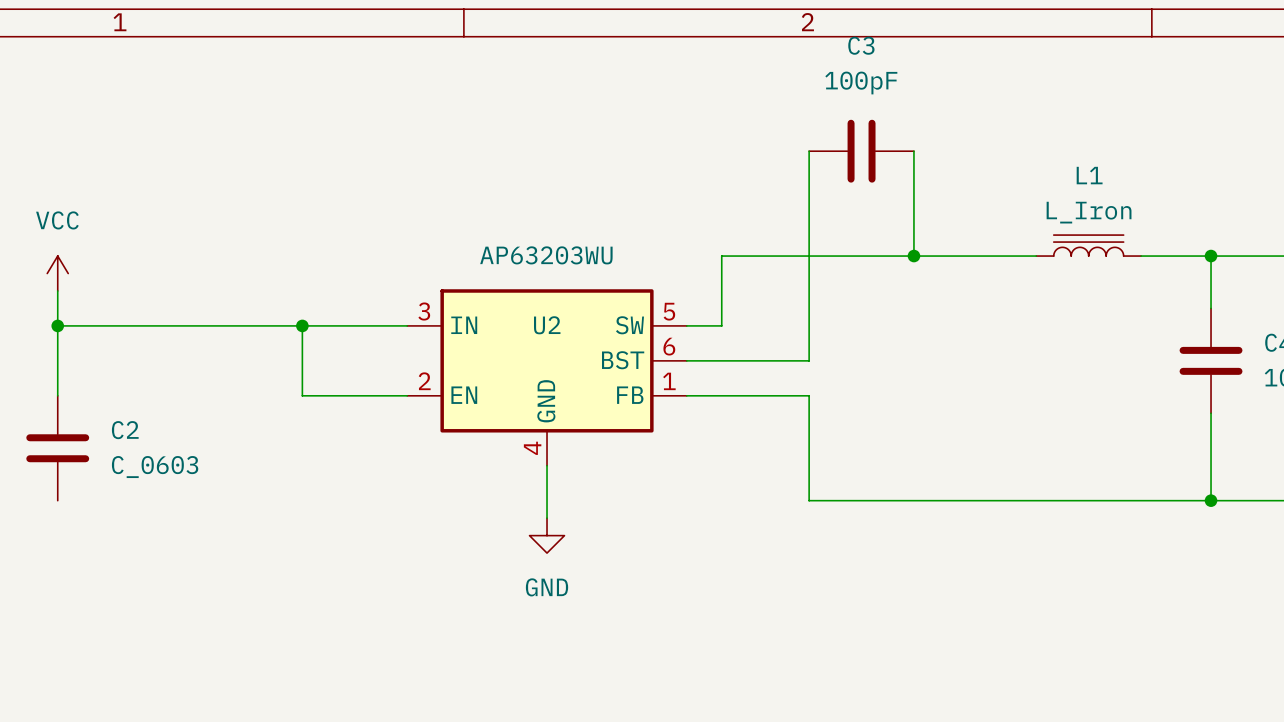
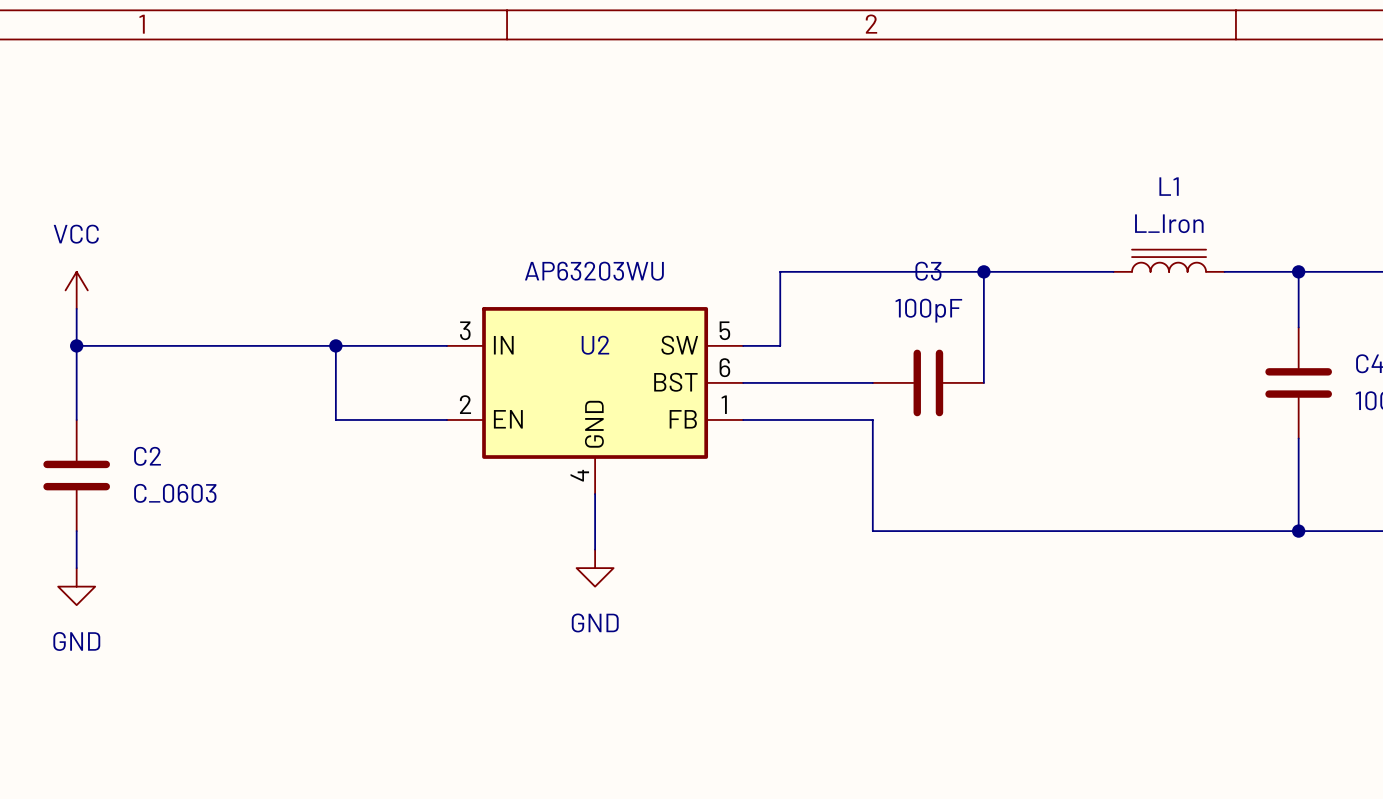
wire: (809, 151) (809, 360) -> none
C3 position: (861, 151) -> (928, 382)
wire: (913, 151) (913, 256) -> (983, 382) (983, 271)
wire: none -> (76, 531) (76, 568)
power symbol: none -> GND (76, 586)

